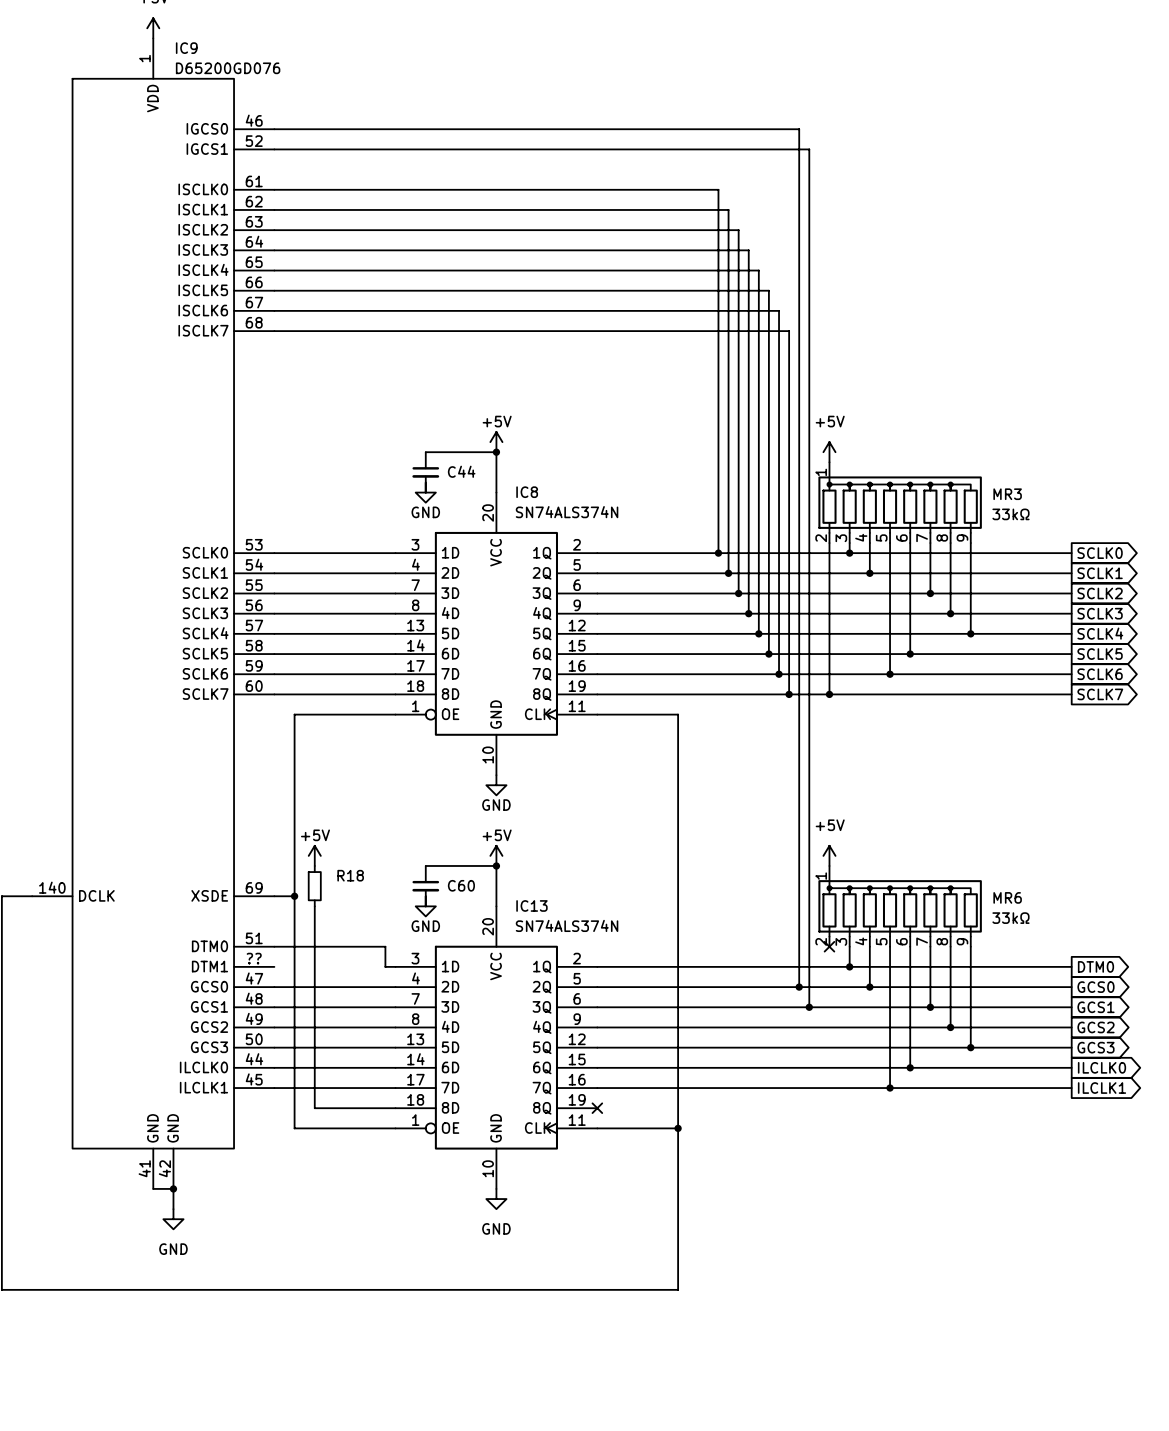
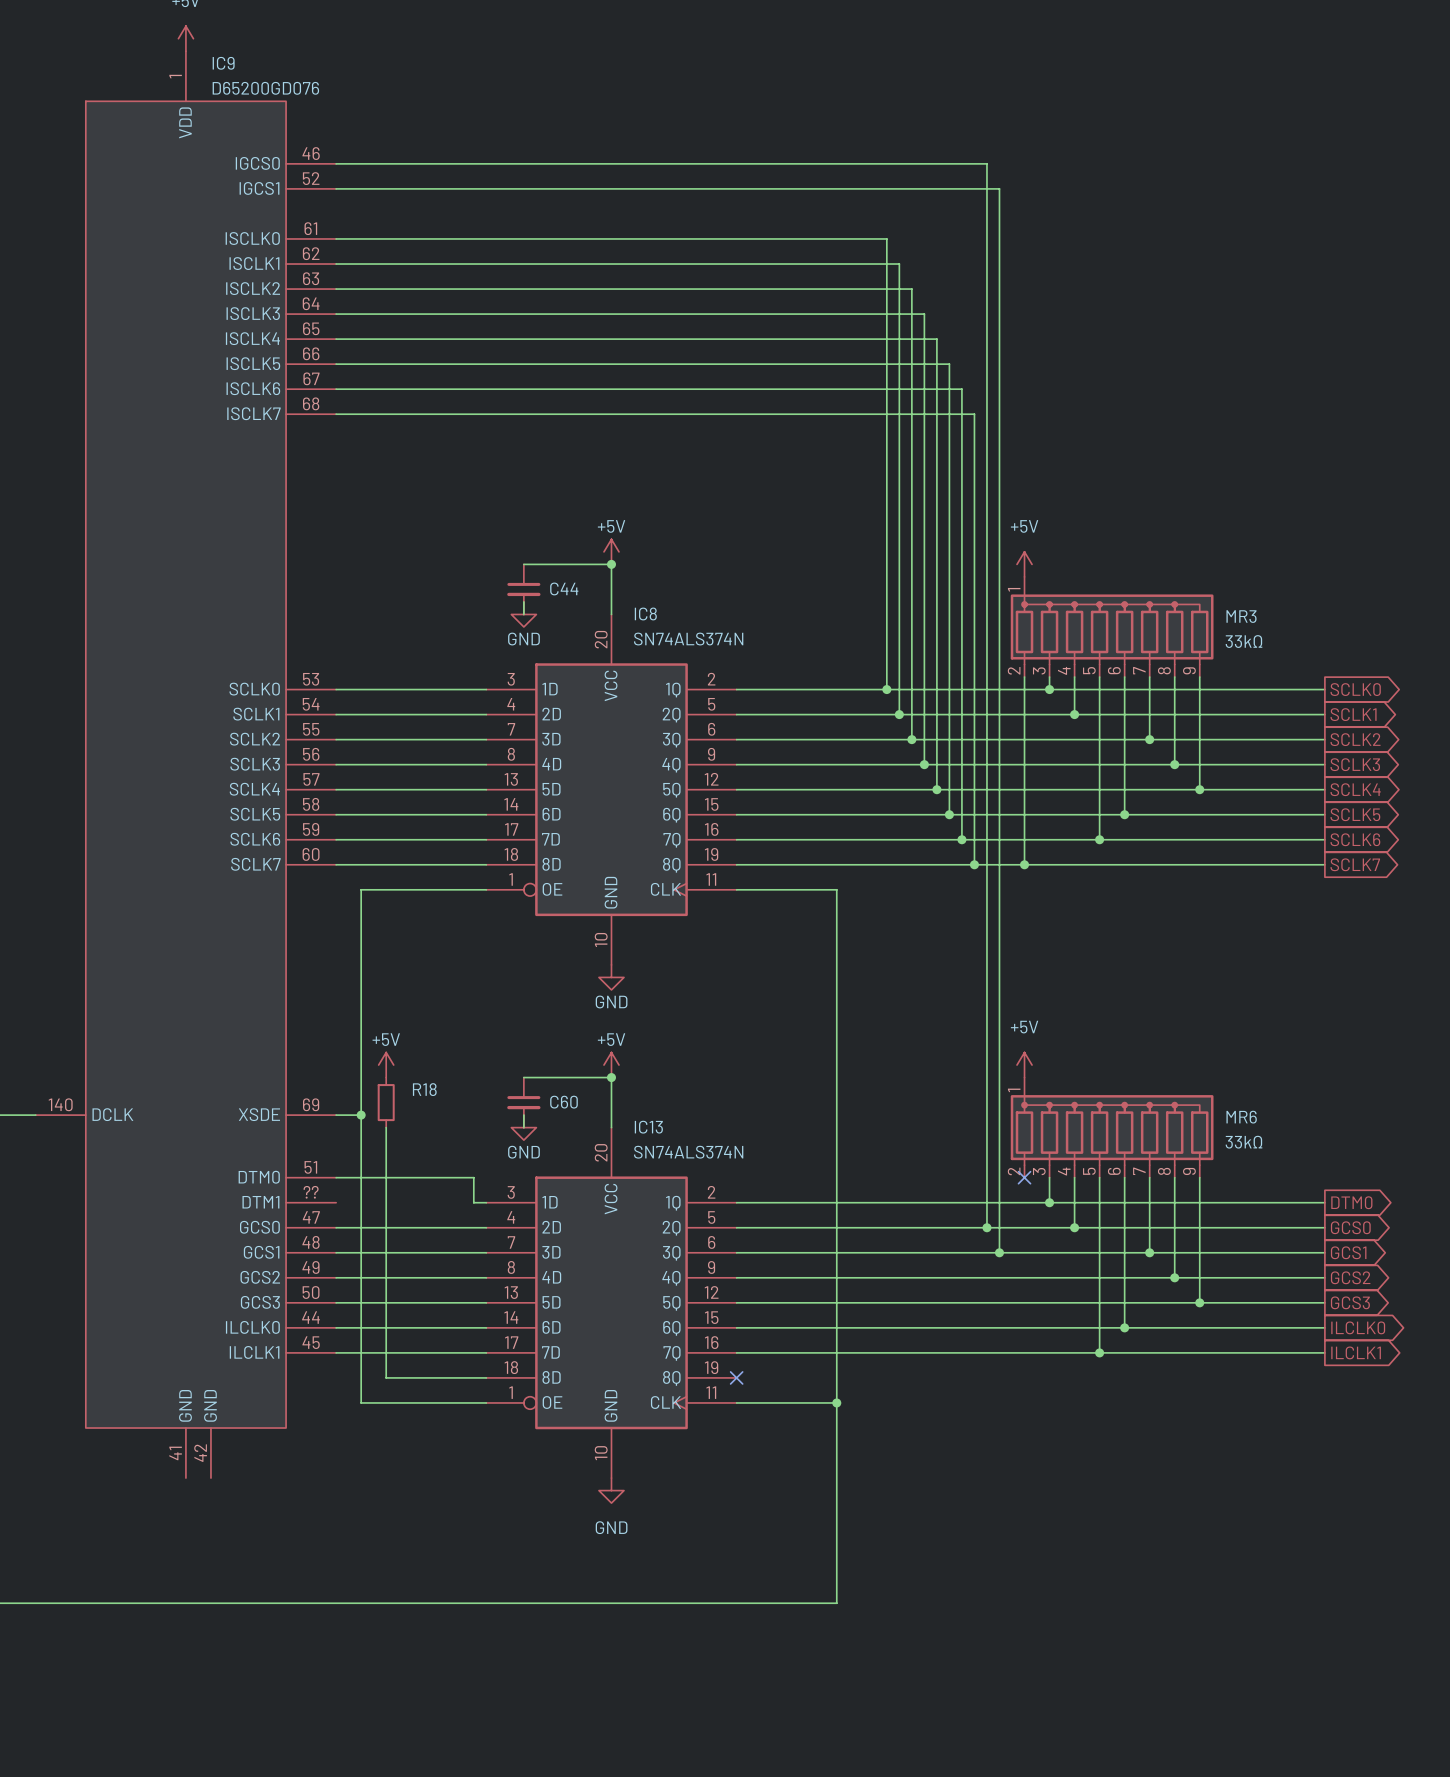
wire: (153, 1188) (173, 1188) (173, 1209) -> none
junction: (173, 1188) -> none
power symbol: GND (173, 1219) -> none

